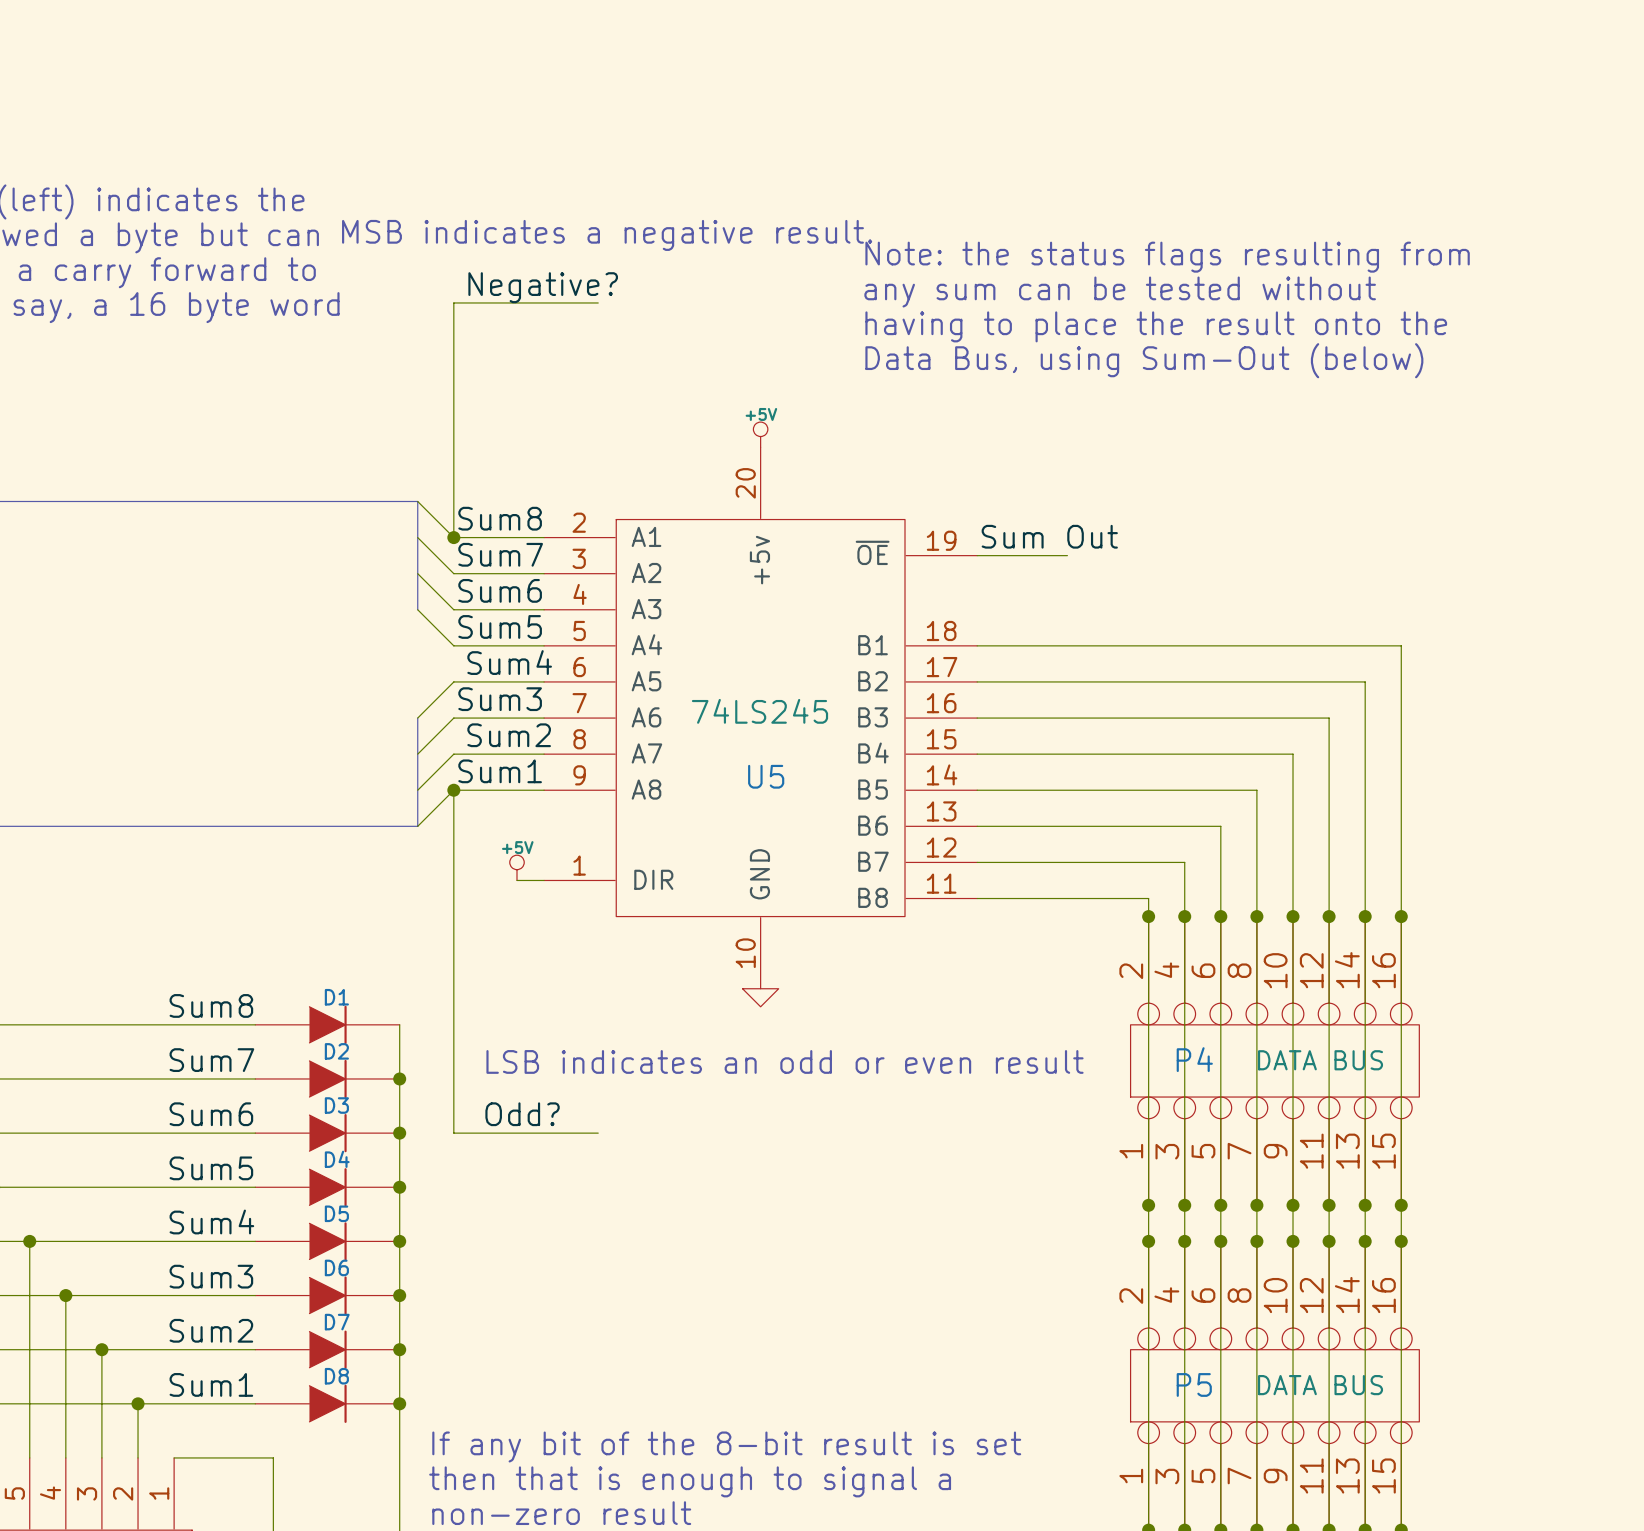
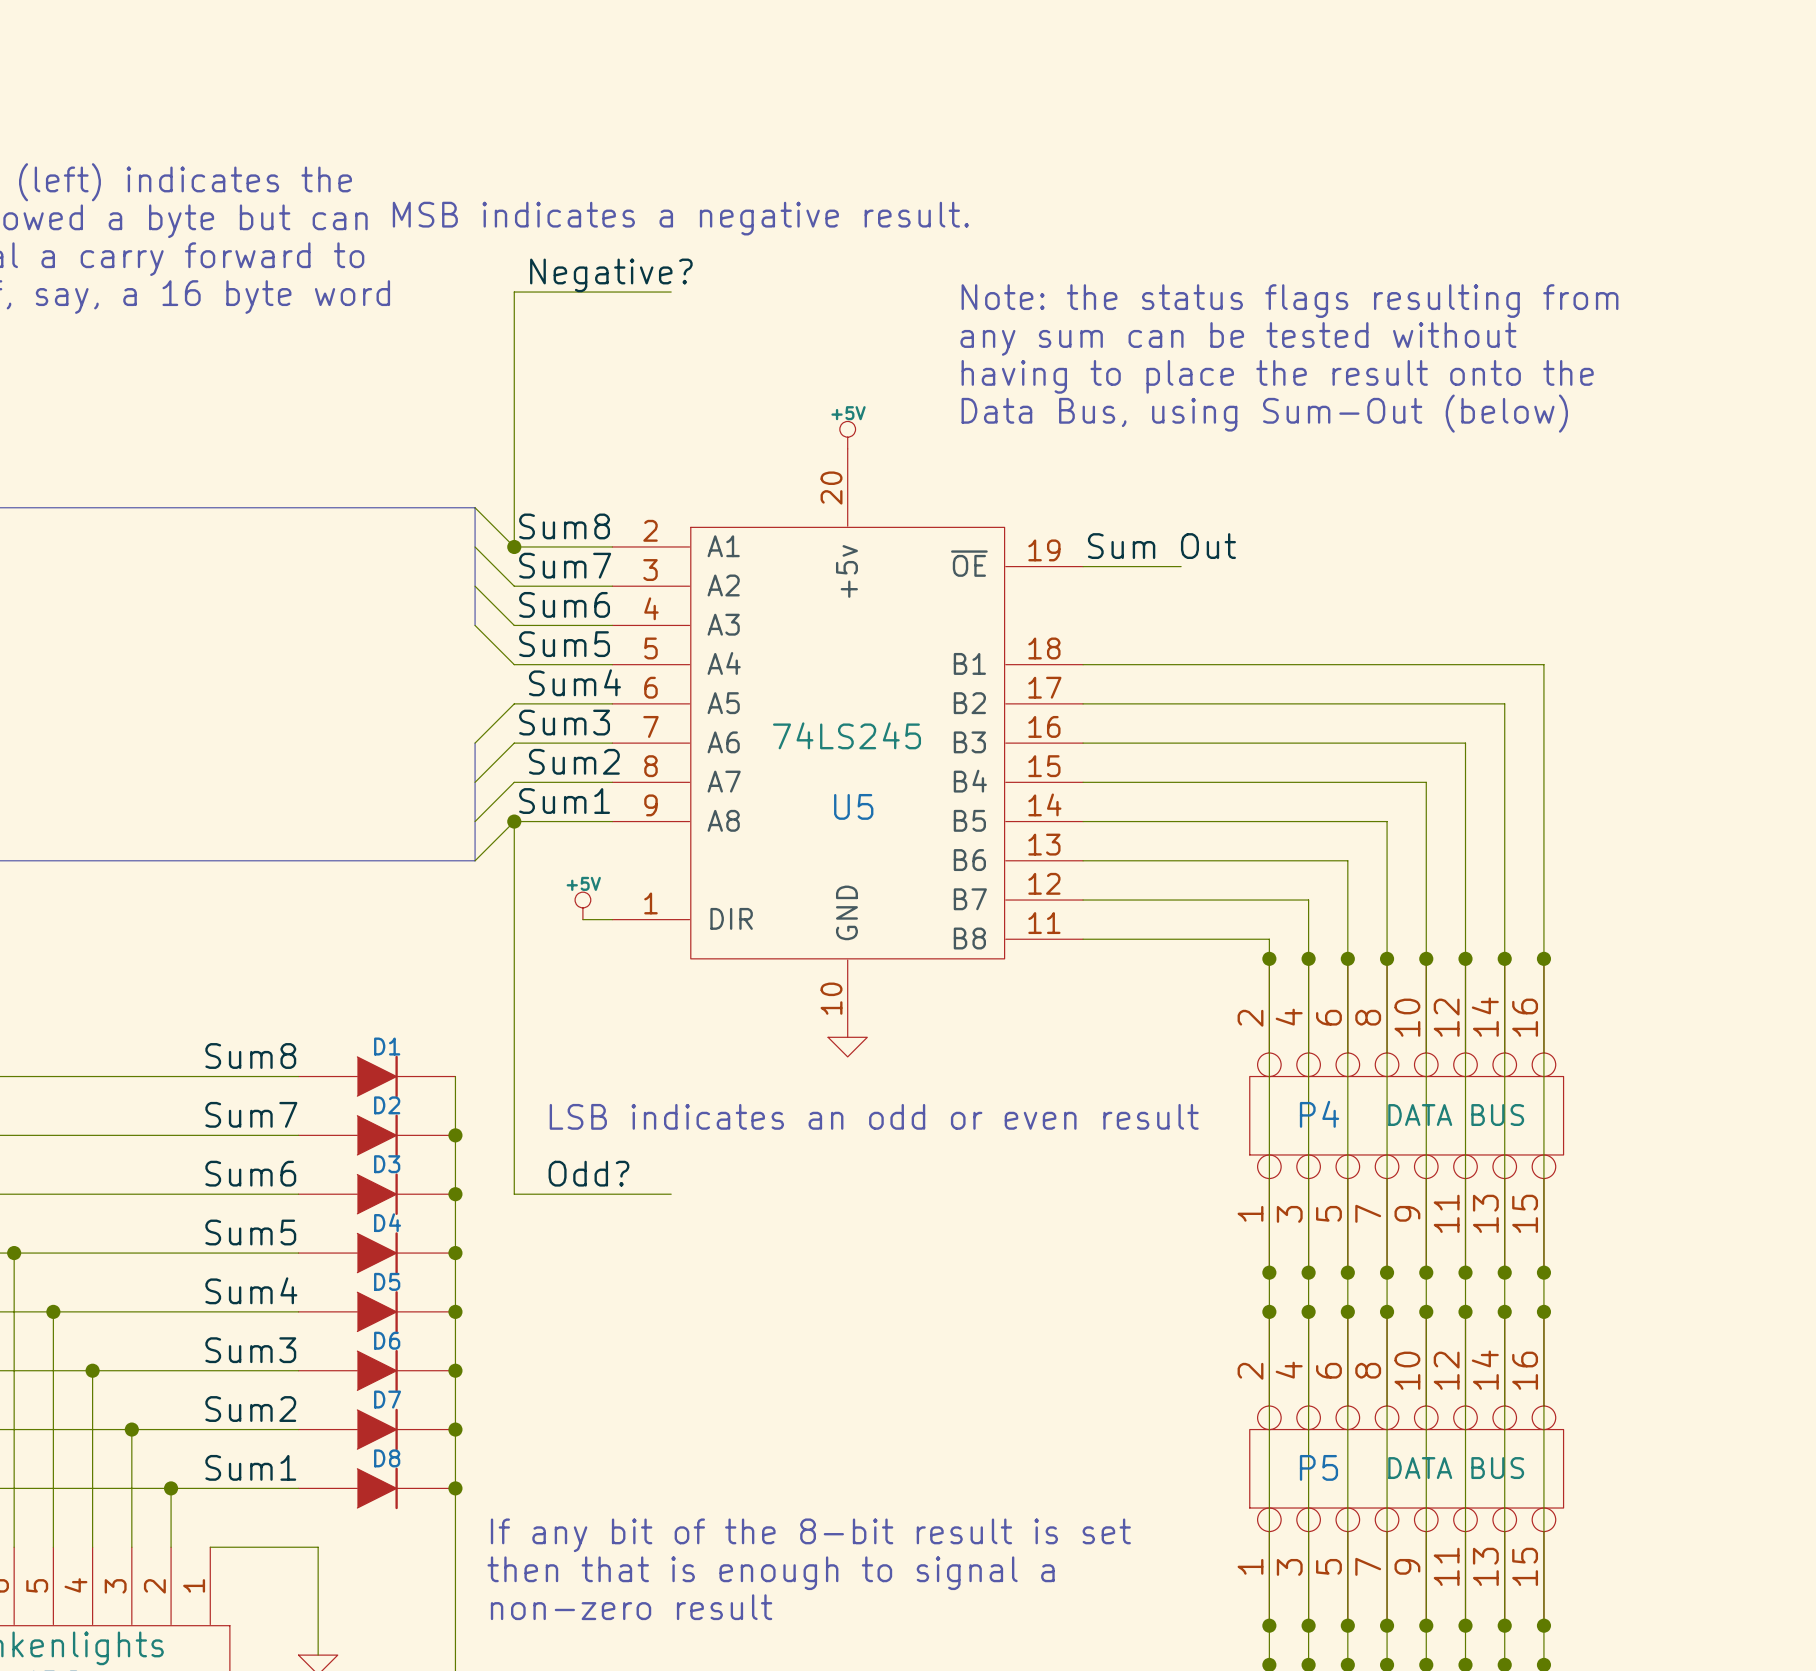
text position: Note: the status flags resulting from (1167, 257) -> Note: the status flags resulting from (1289, 301)
text position: any sum can be tested without (1120, 292) -> any sum can be tested without (1238, 338)
text position: having to place the result onto the (1156, 326) -> having to place the result onto the (1277, 376)
text position: Data Bus, using Sum-Out (below) (1144, 360) -> Data Bus, using Sum-Out (below) (1264, 413)

